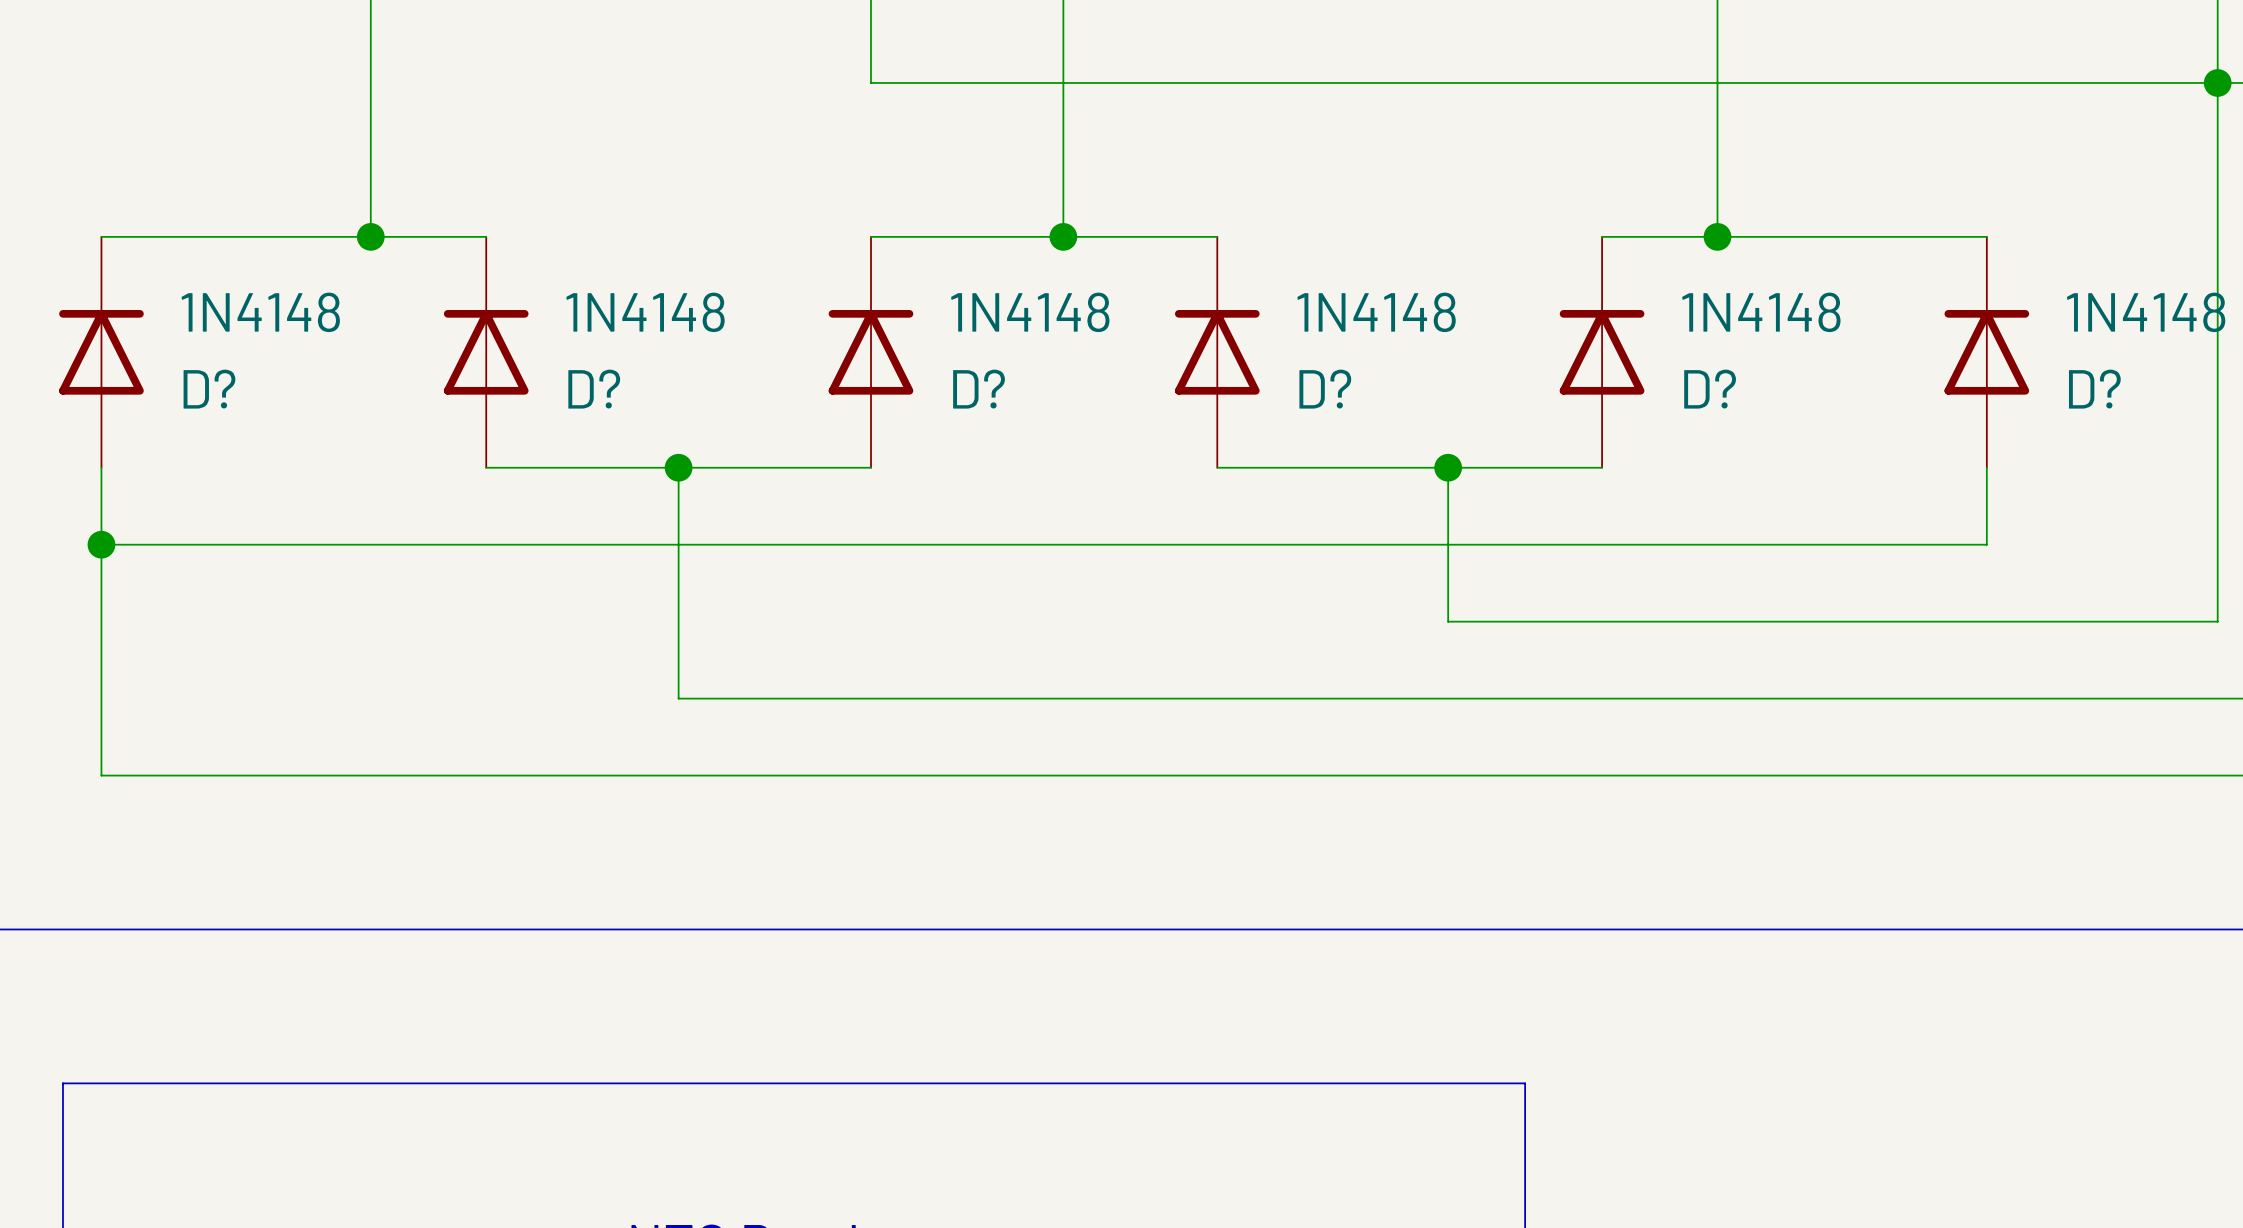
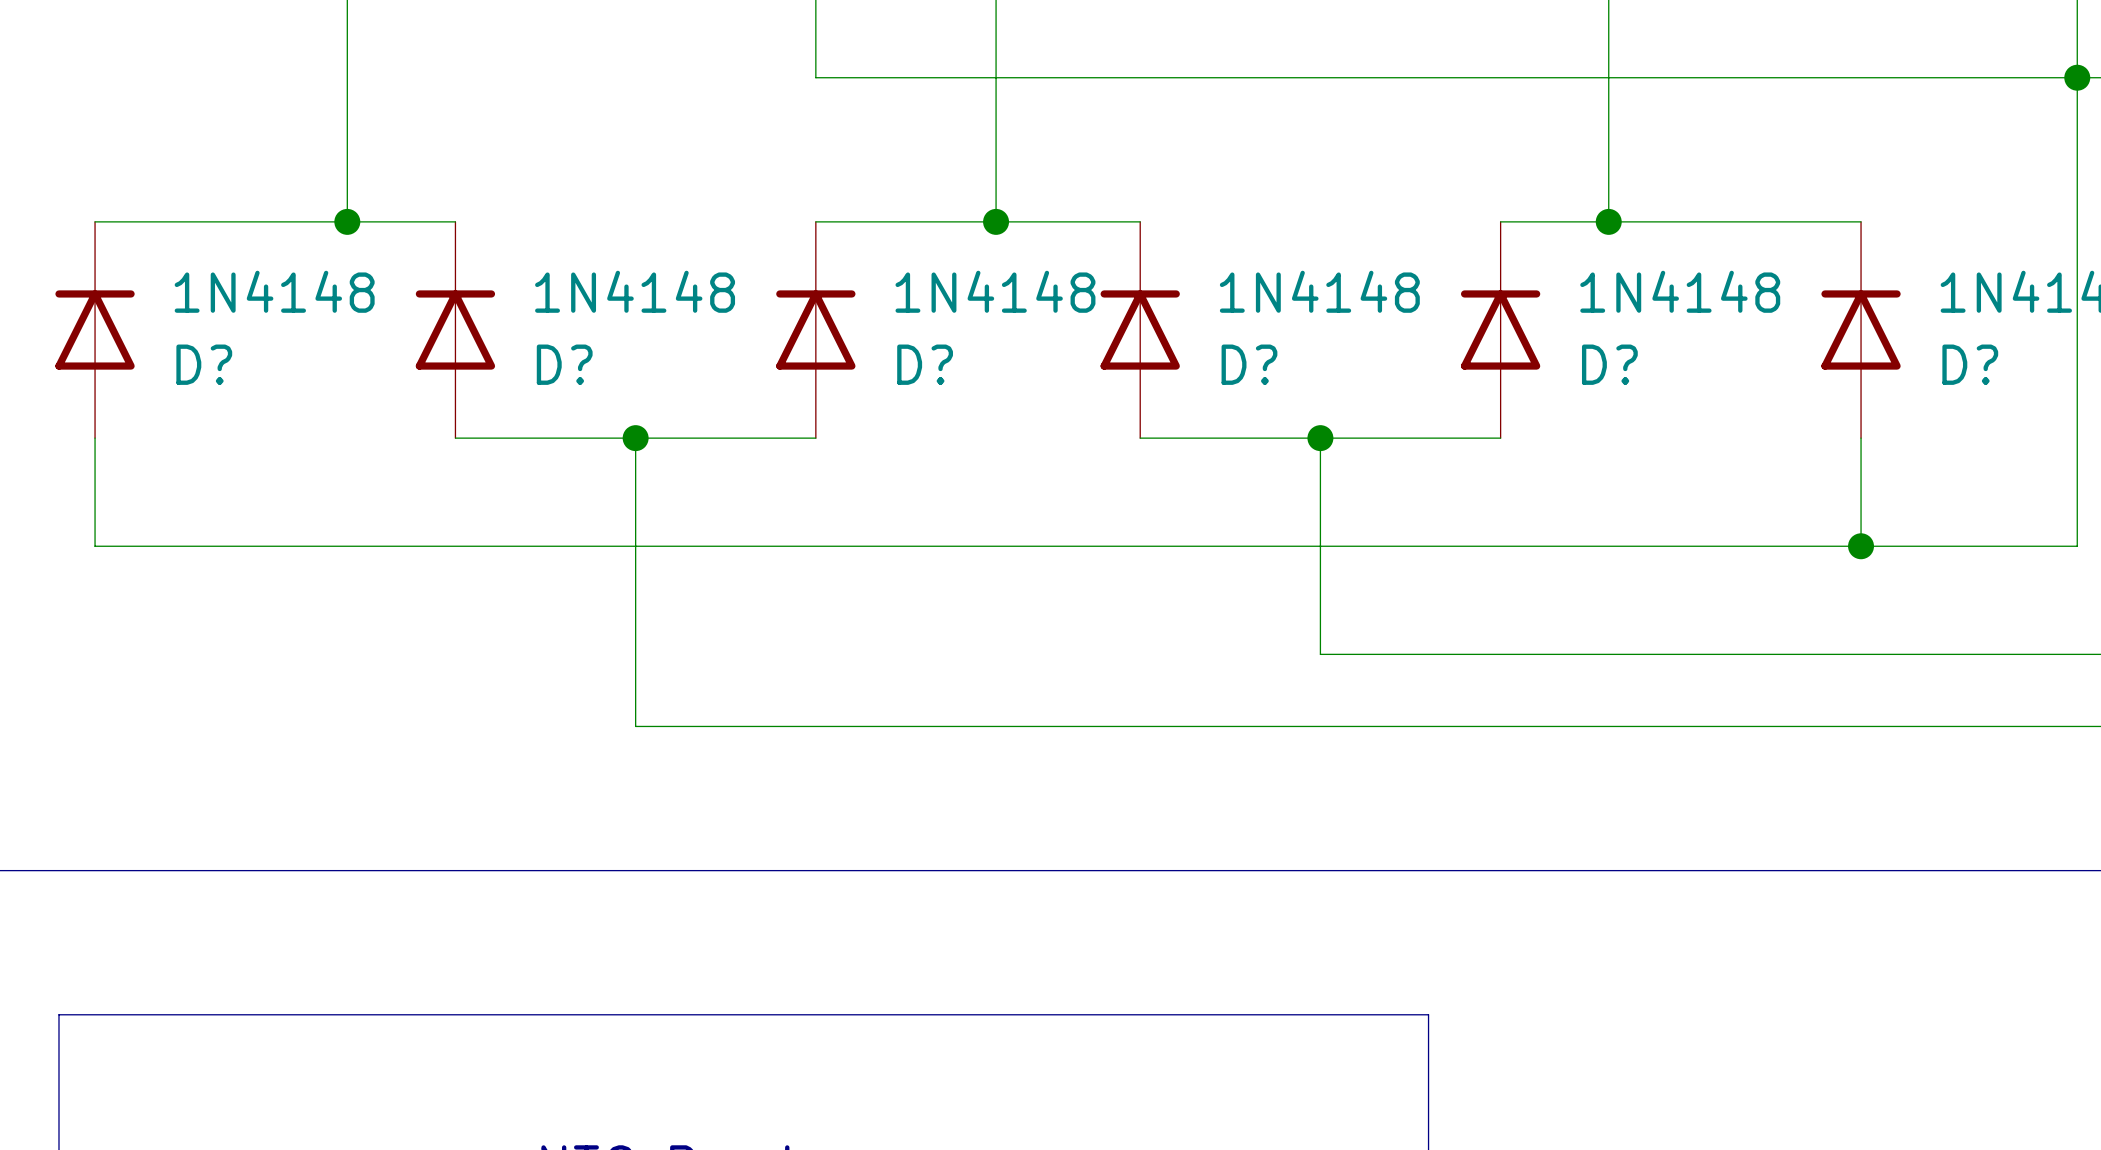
wire: (1448, 467) (1448, 621) (2217, 621) (2217, 583) -> (95, 546) (2077, 546)
junction position: (1448, 467) -> (1320, 438)
wire: (101, 544) (1986, 544) -> (1861, 546) (1861, 510)
junction: (101, 544) -> none
wire: (101, 583) (101, 775) (678, 775) -> (635, 654) (635, 726)
junction: none -> (1861, 546)
wire: (678, 698) (1409, 698) -> (1320, 438) (1320, 654)

